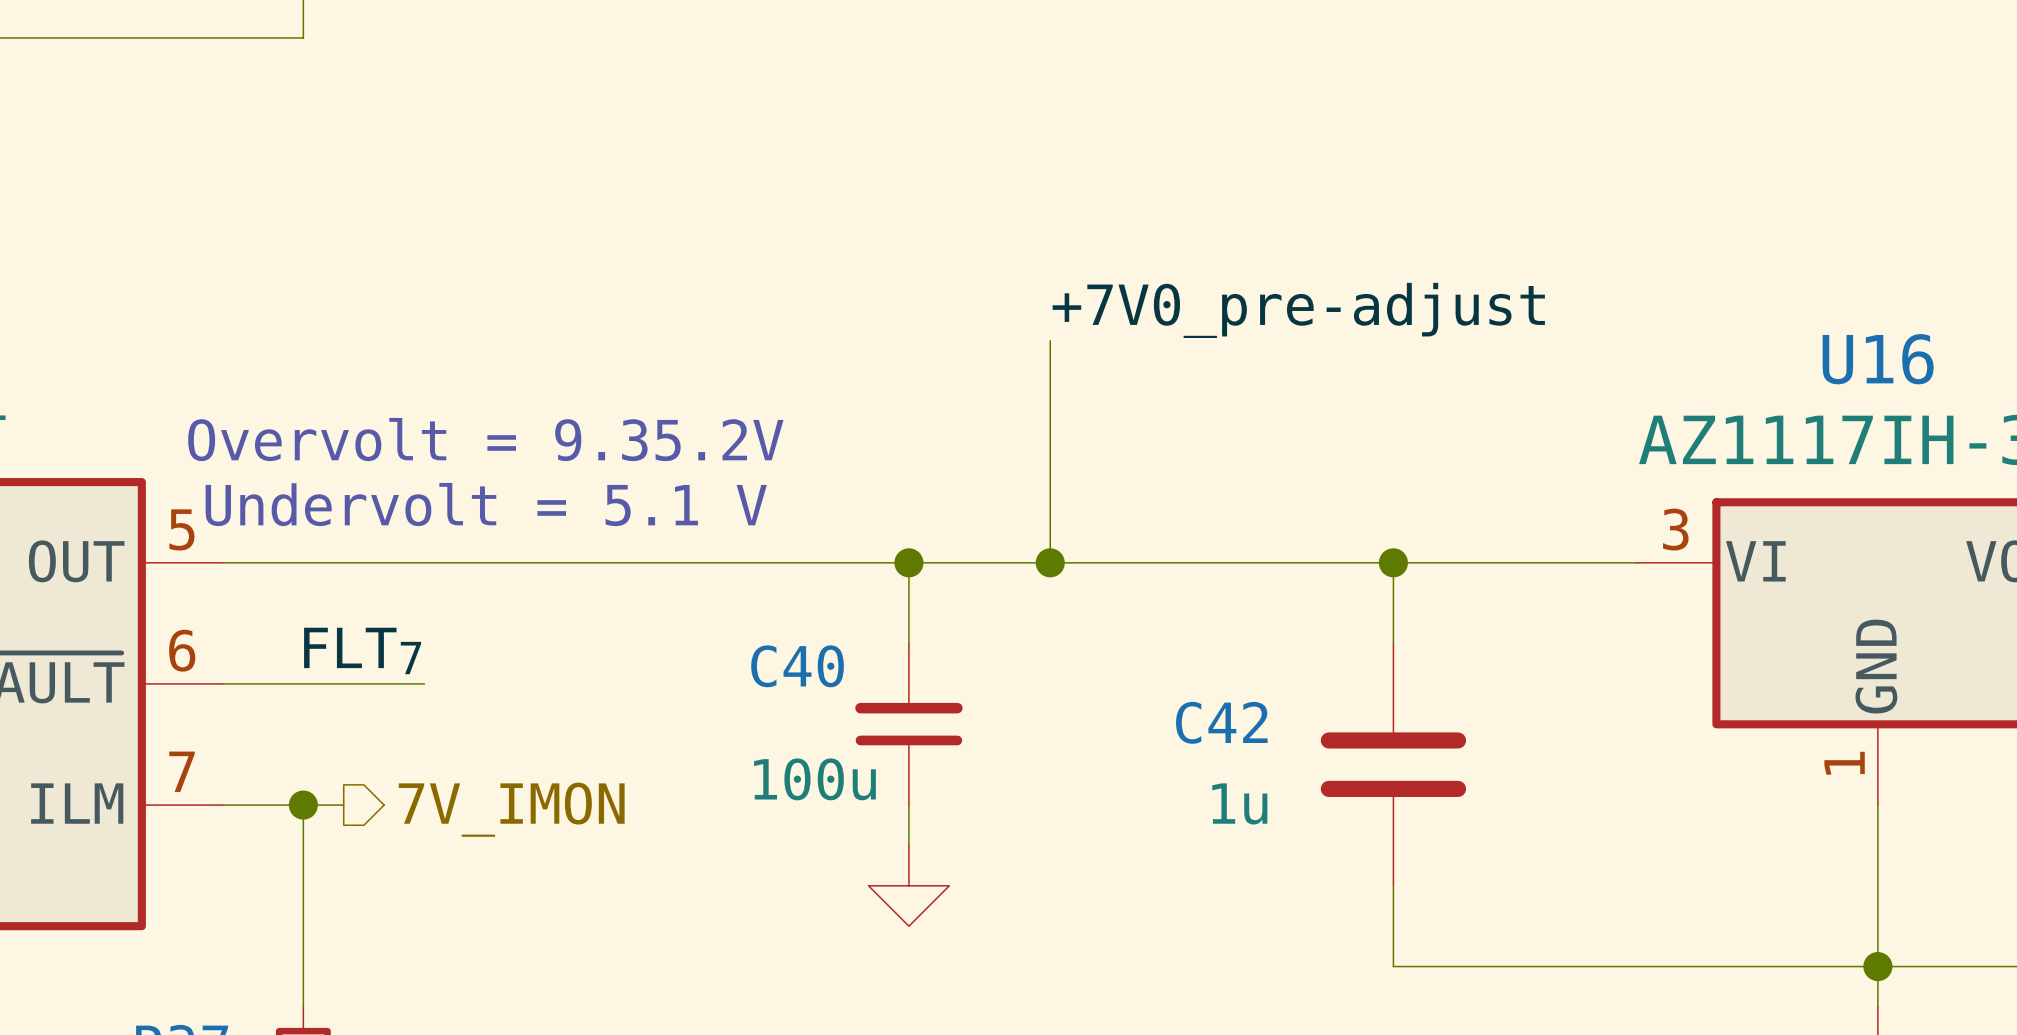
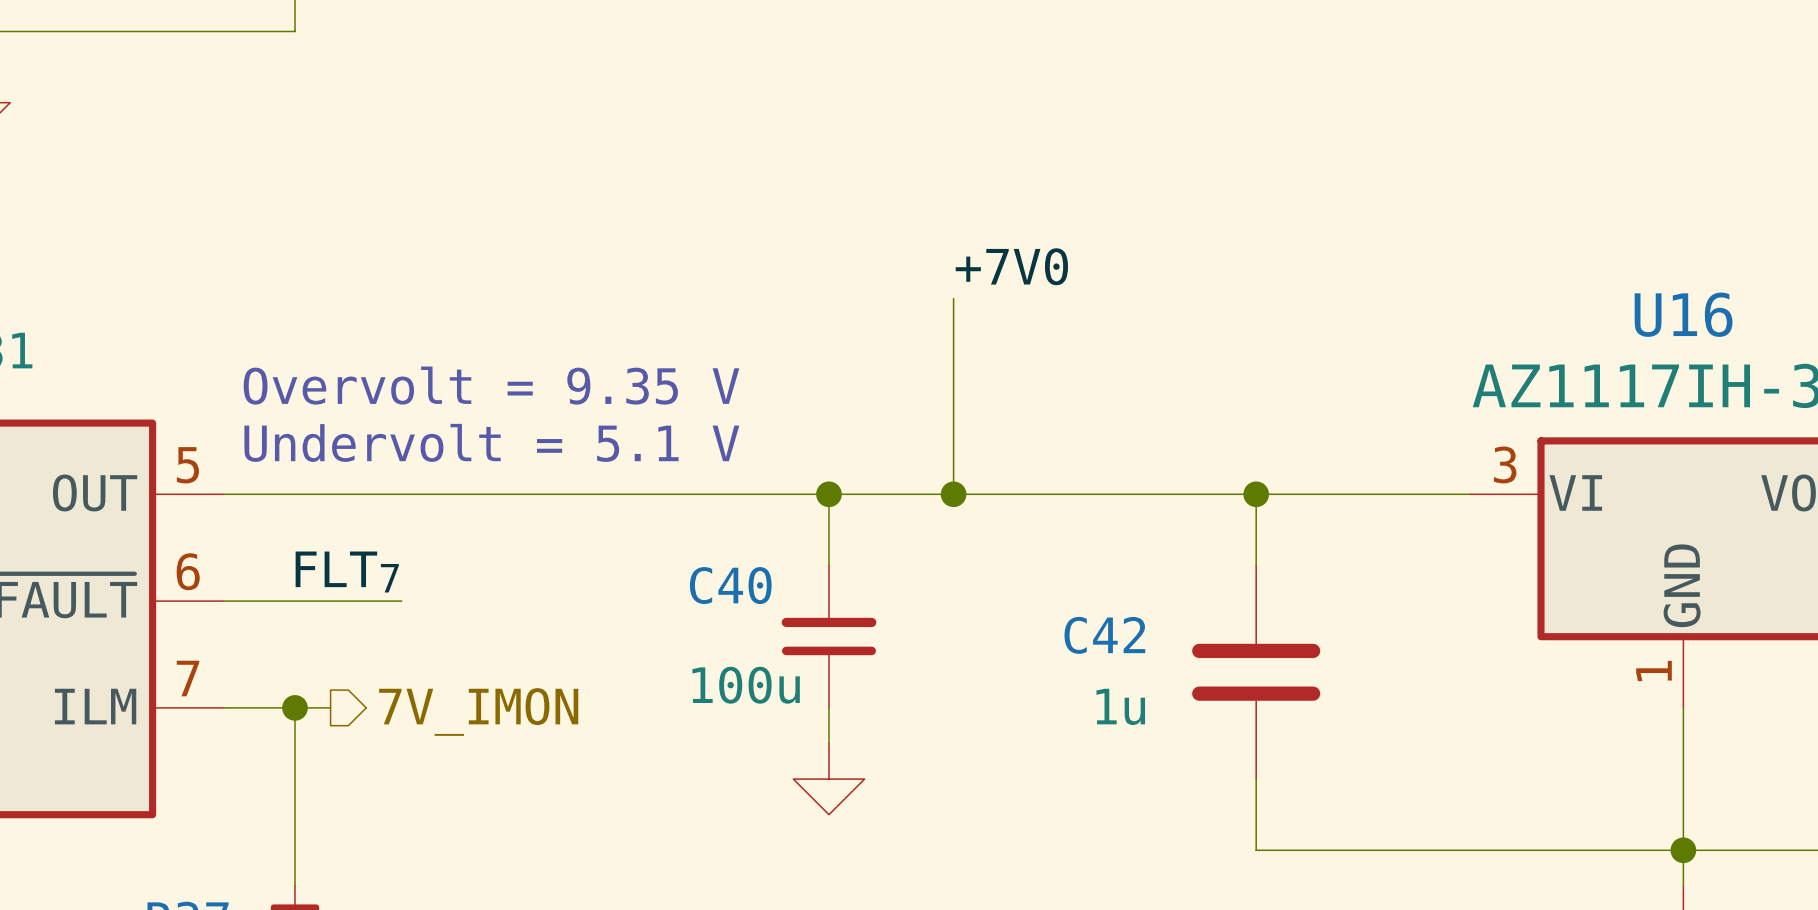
label: +7V0_pre-adjust (1298, 310) -> +7V0 (1011, 266)
text: Overvolt = 9.35.2V (485, 439) -> Overvolt = 9.35 V (491, 385)
text position: Undervolt = 5.1 V (486, 504) -> Undervolt = 5.1 V (491, 442)

